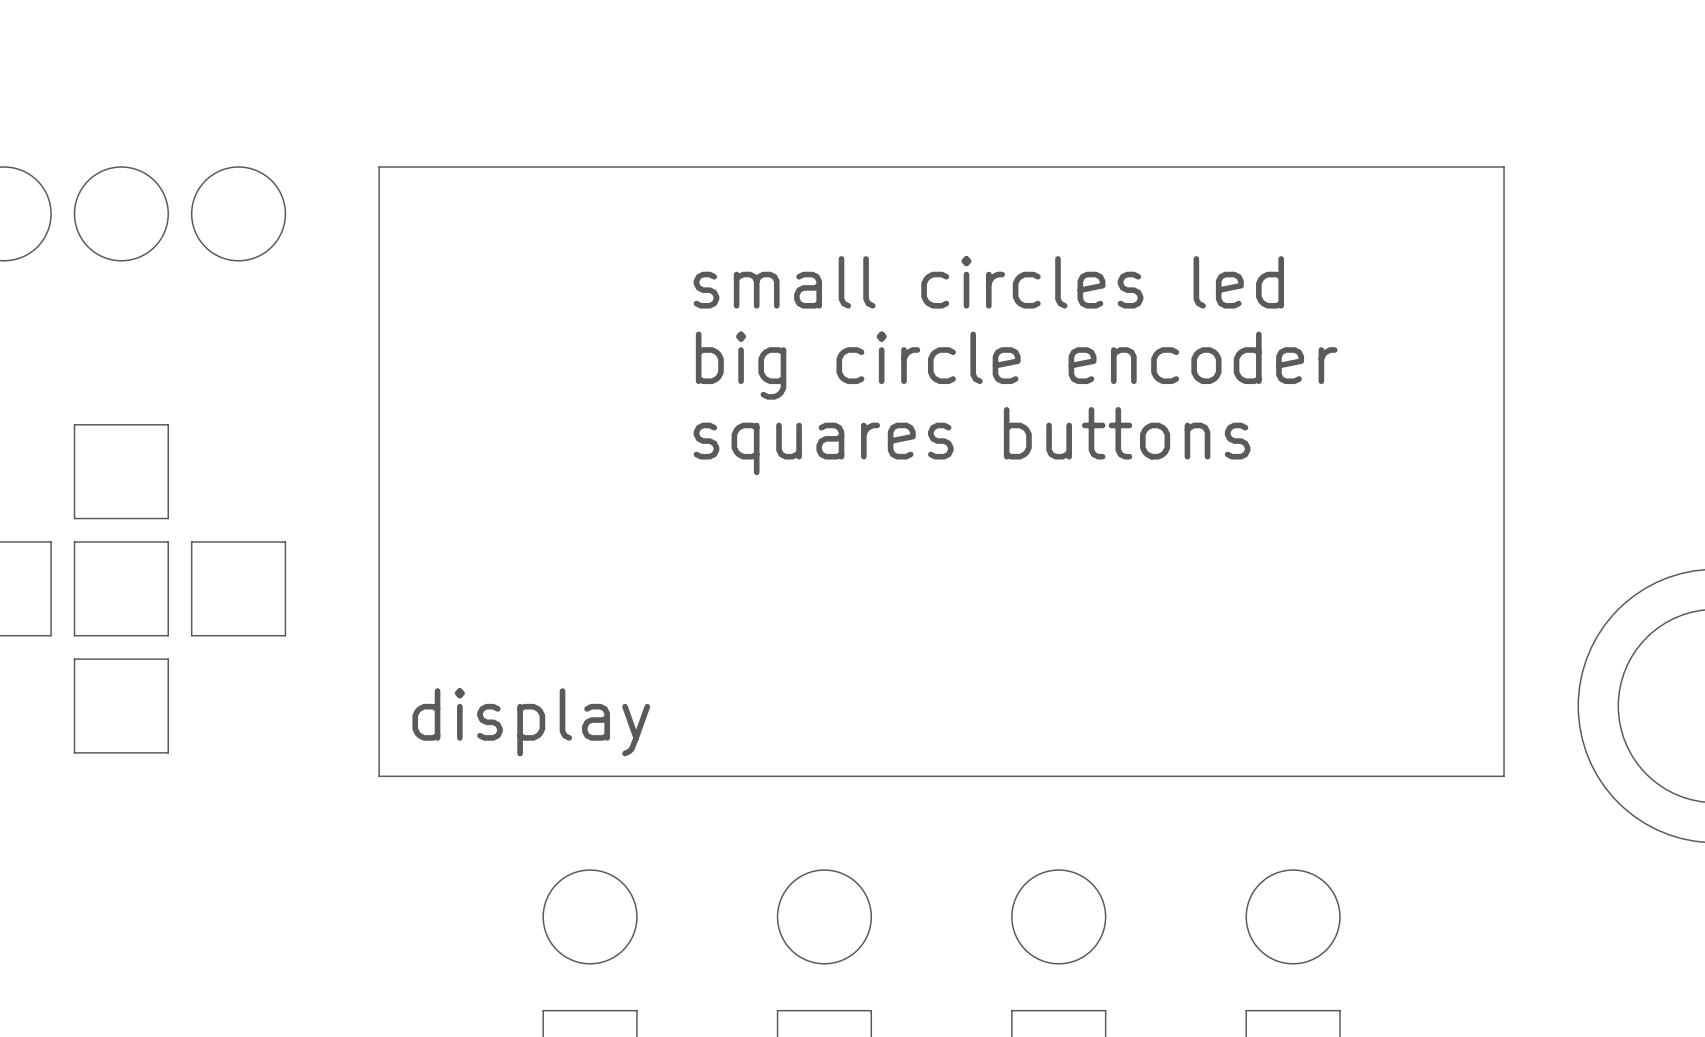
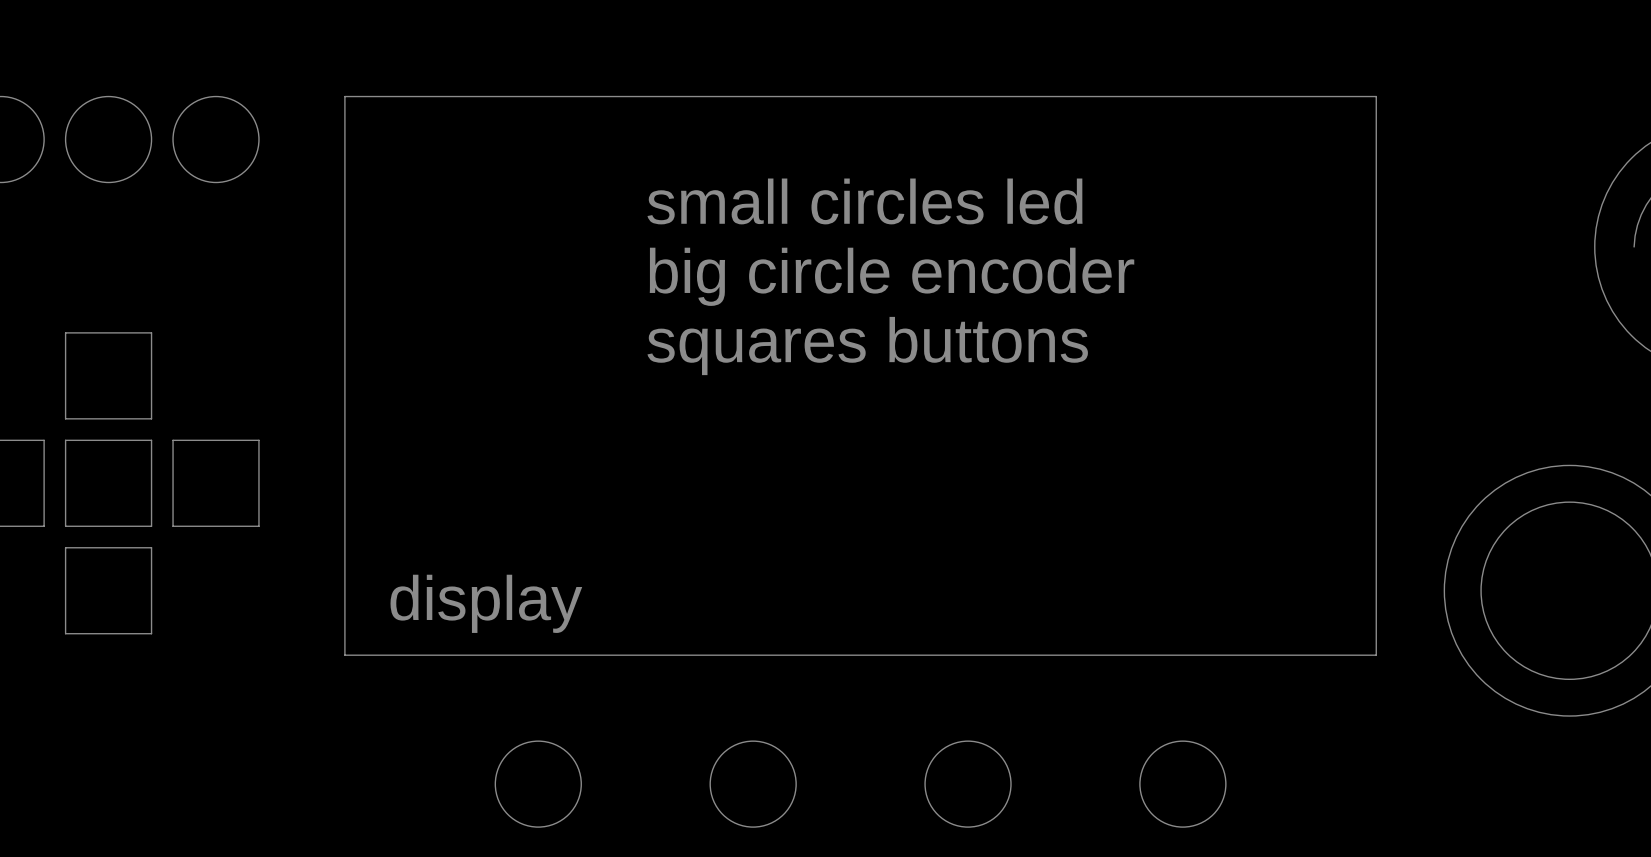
text position: small circles led (988, 282) -> small circles led (864, 201)
text position: big circle encoder (1016, 365) -> big circle encoder (892, 276)
text position: squares buttons (972, 441) -> squares buttons (867, 346)
text position: display (531, 722) -> display (486, 603)

